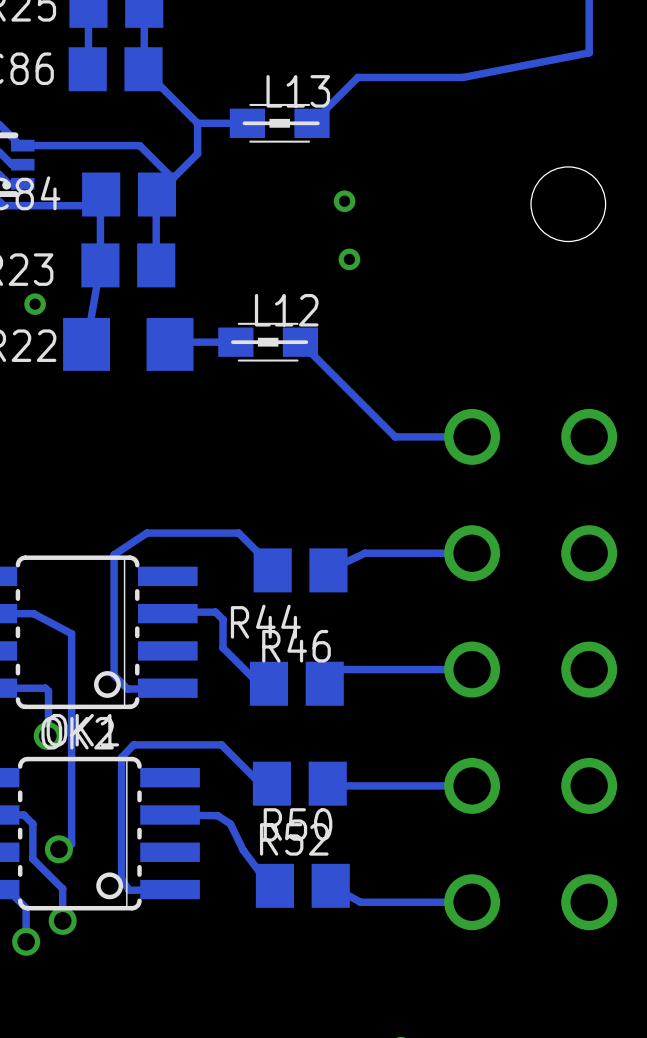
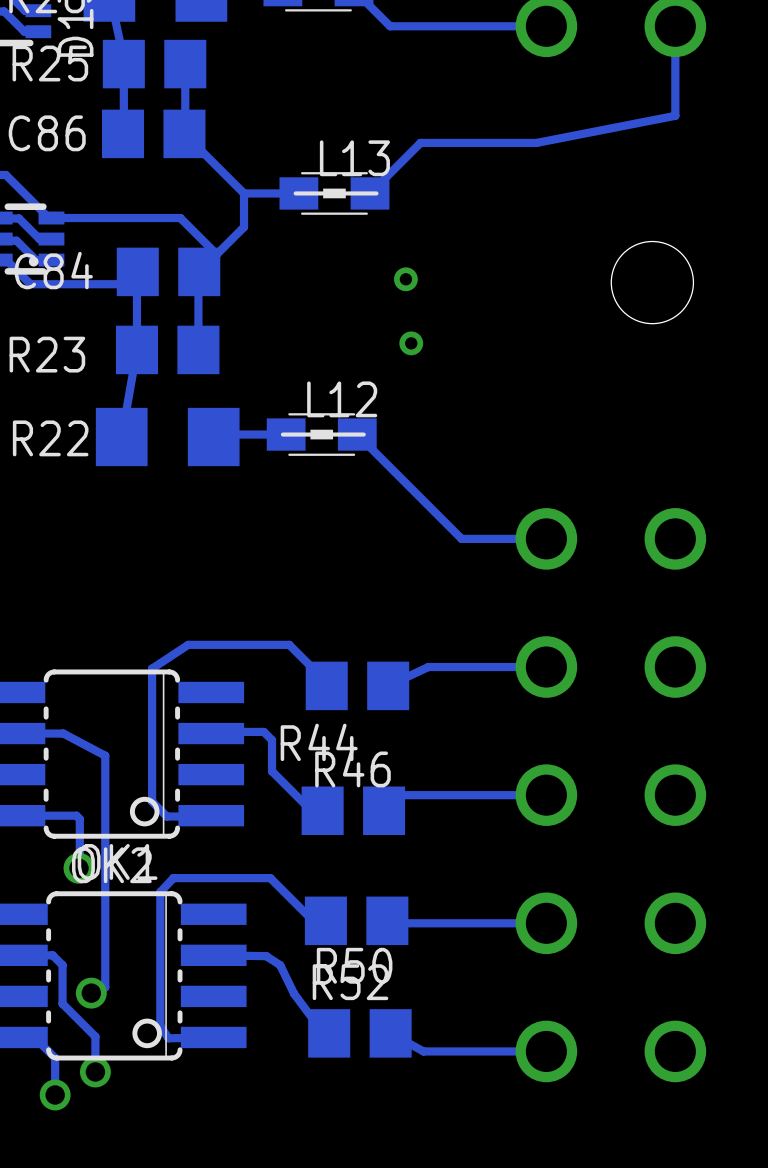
via: (35, 304) -> none

